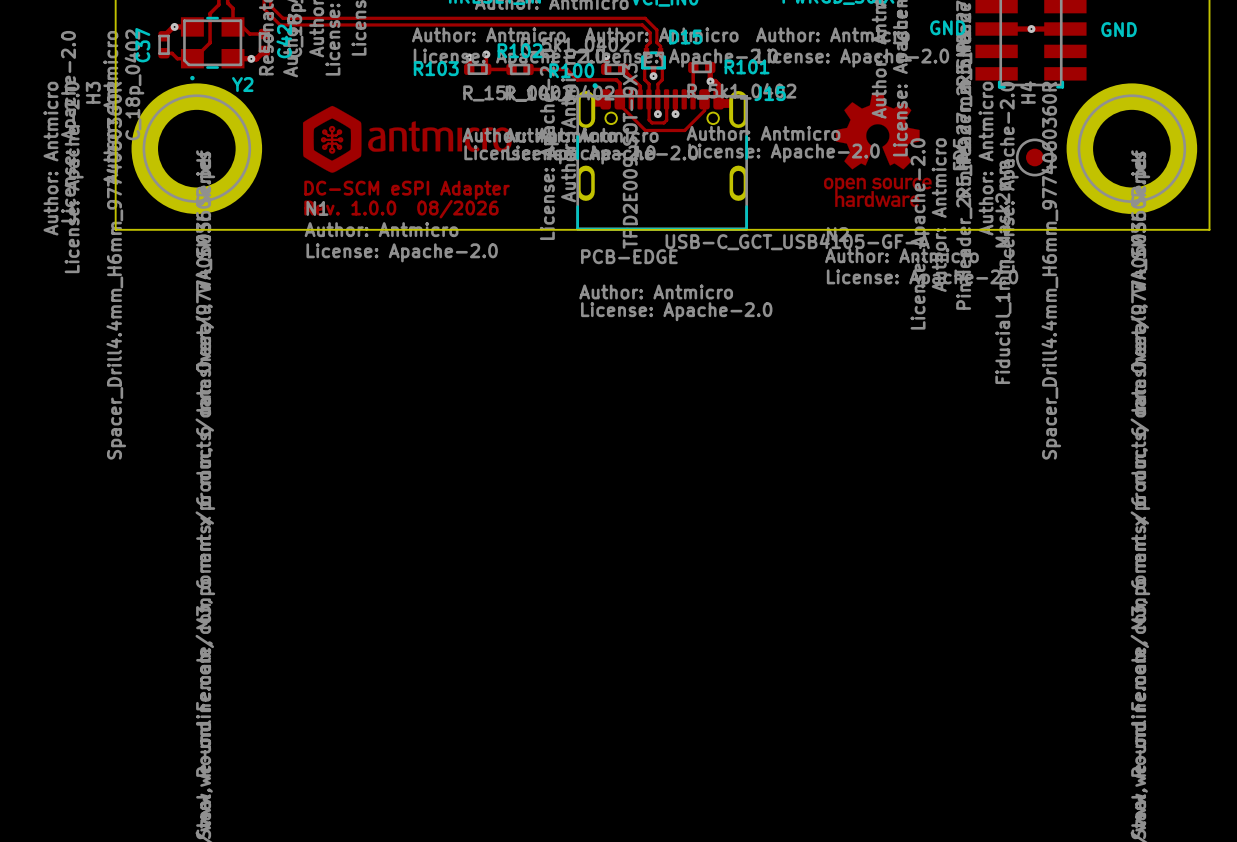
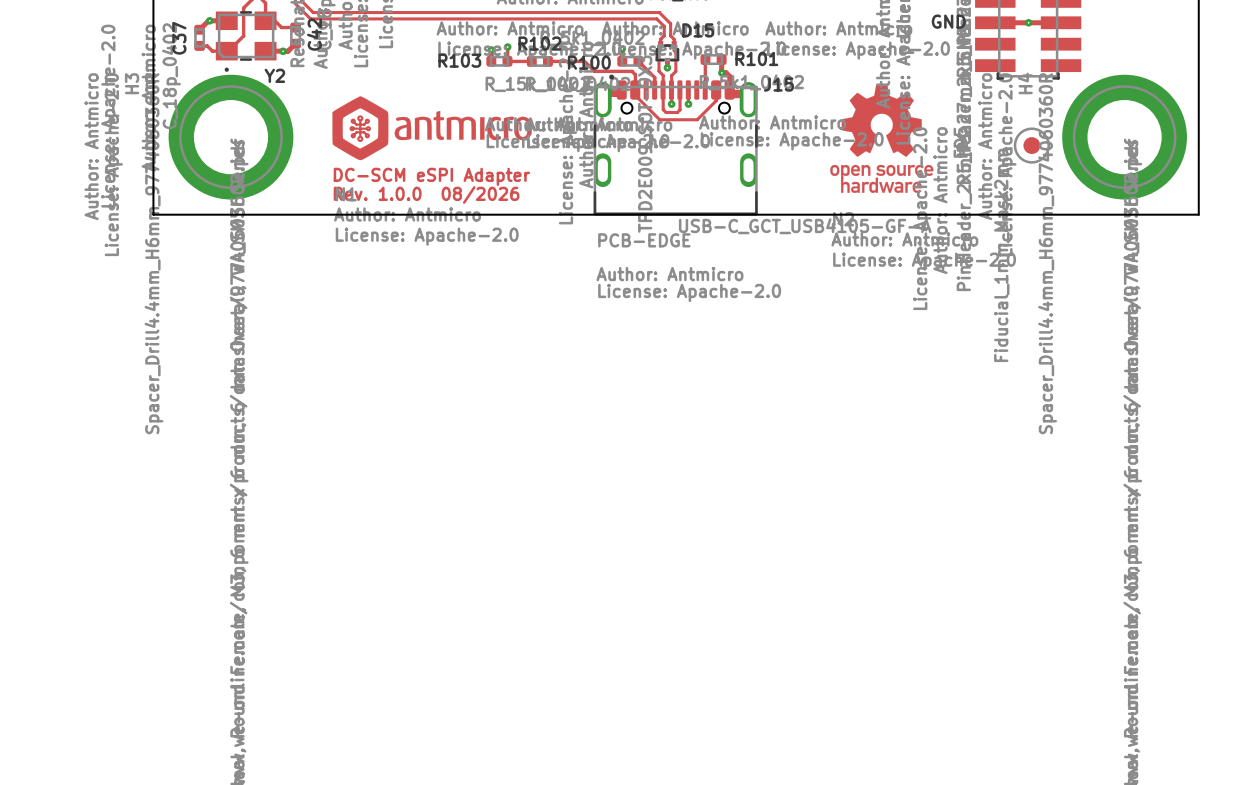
text: GND (1119, 29) -> none

